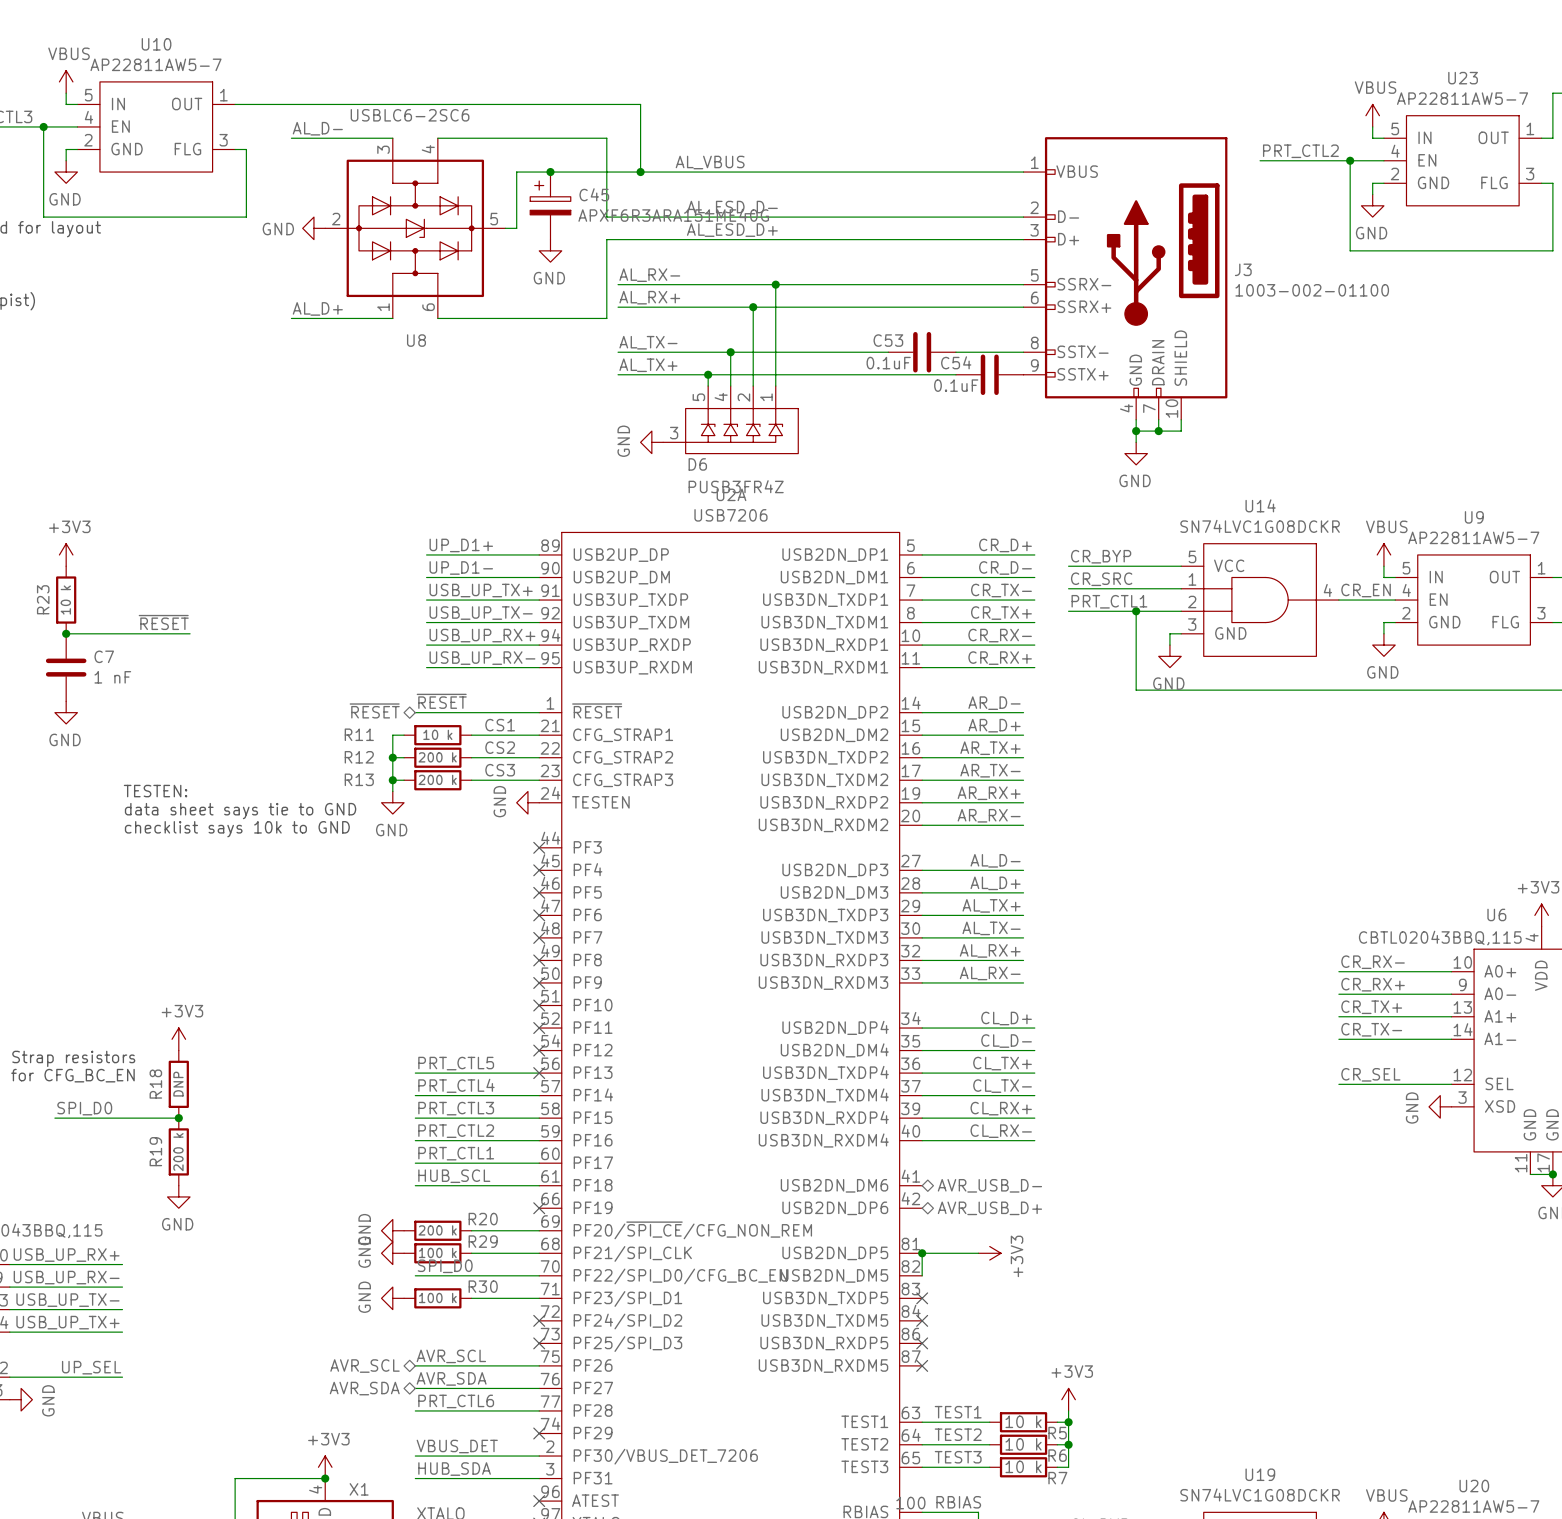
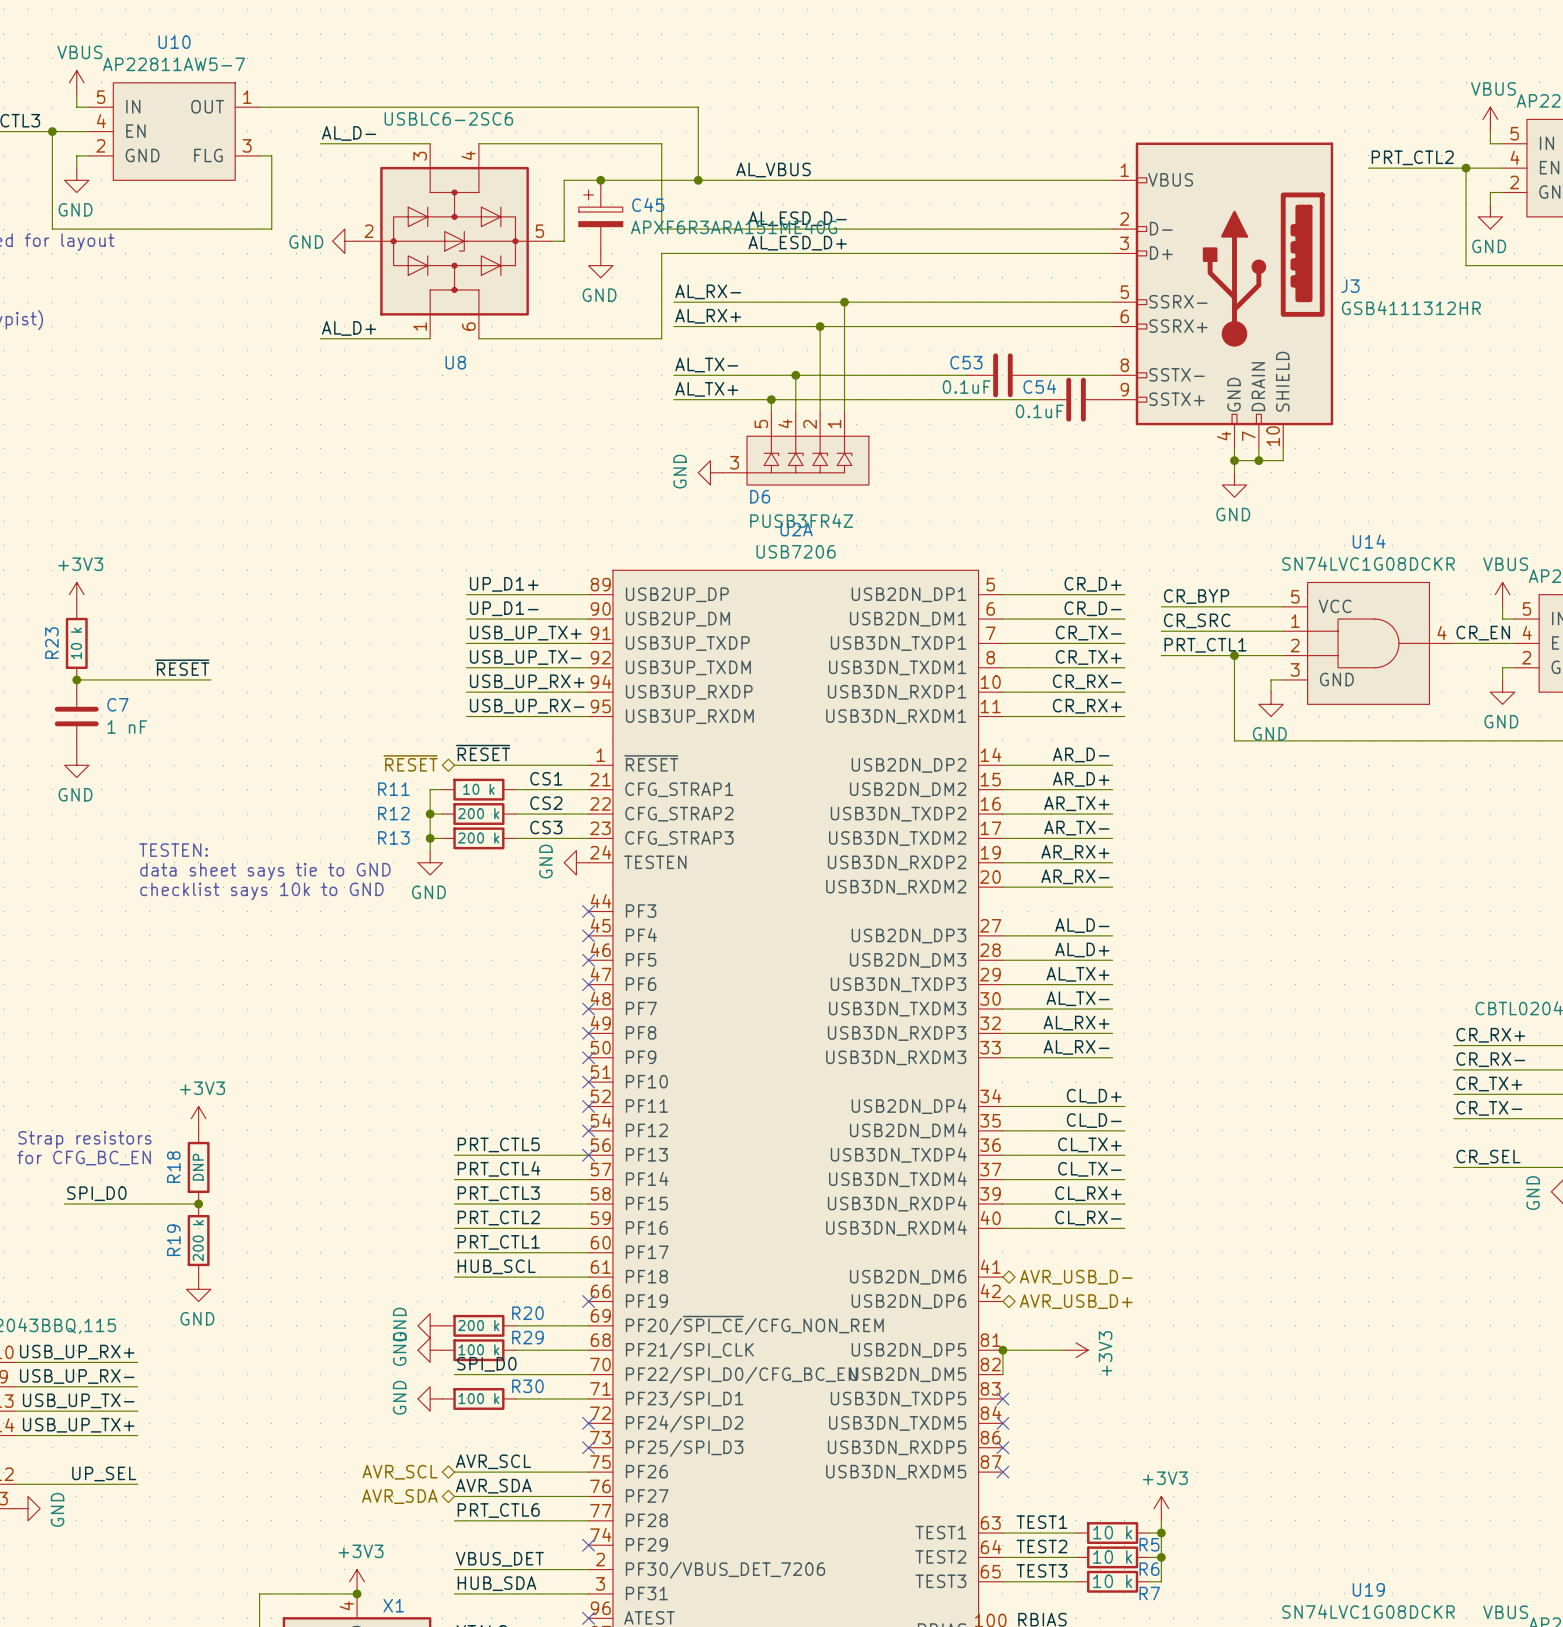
J3 value: 1003-002-01100 (1312, 290) -> GSB4111312HR (1411, 308)
label: CR_RX- (1373, 962) -> CR_RX+ (1490, 1035)
label: CR_RX+ (1373, 984) -> CR_RX- (1490, 1059)

